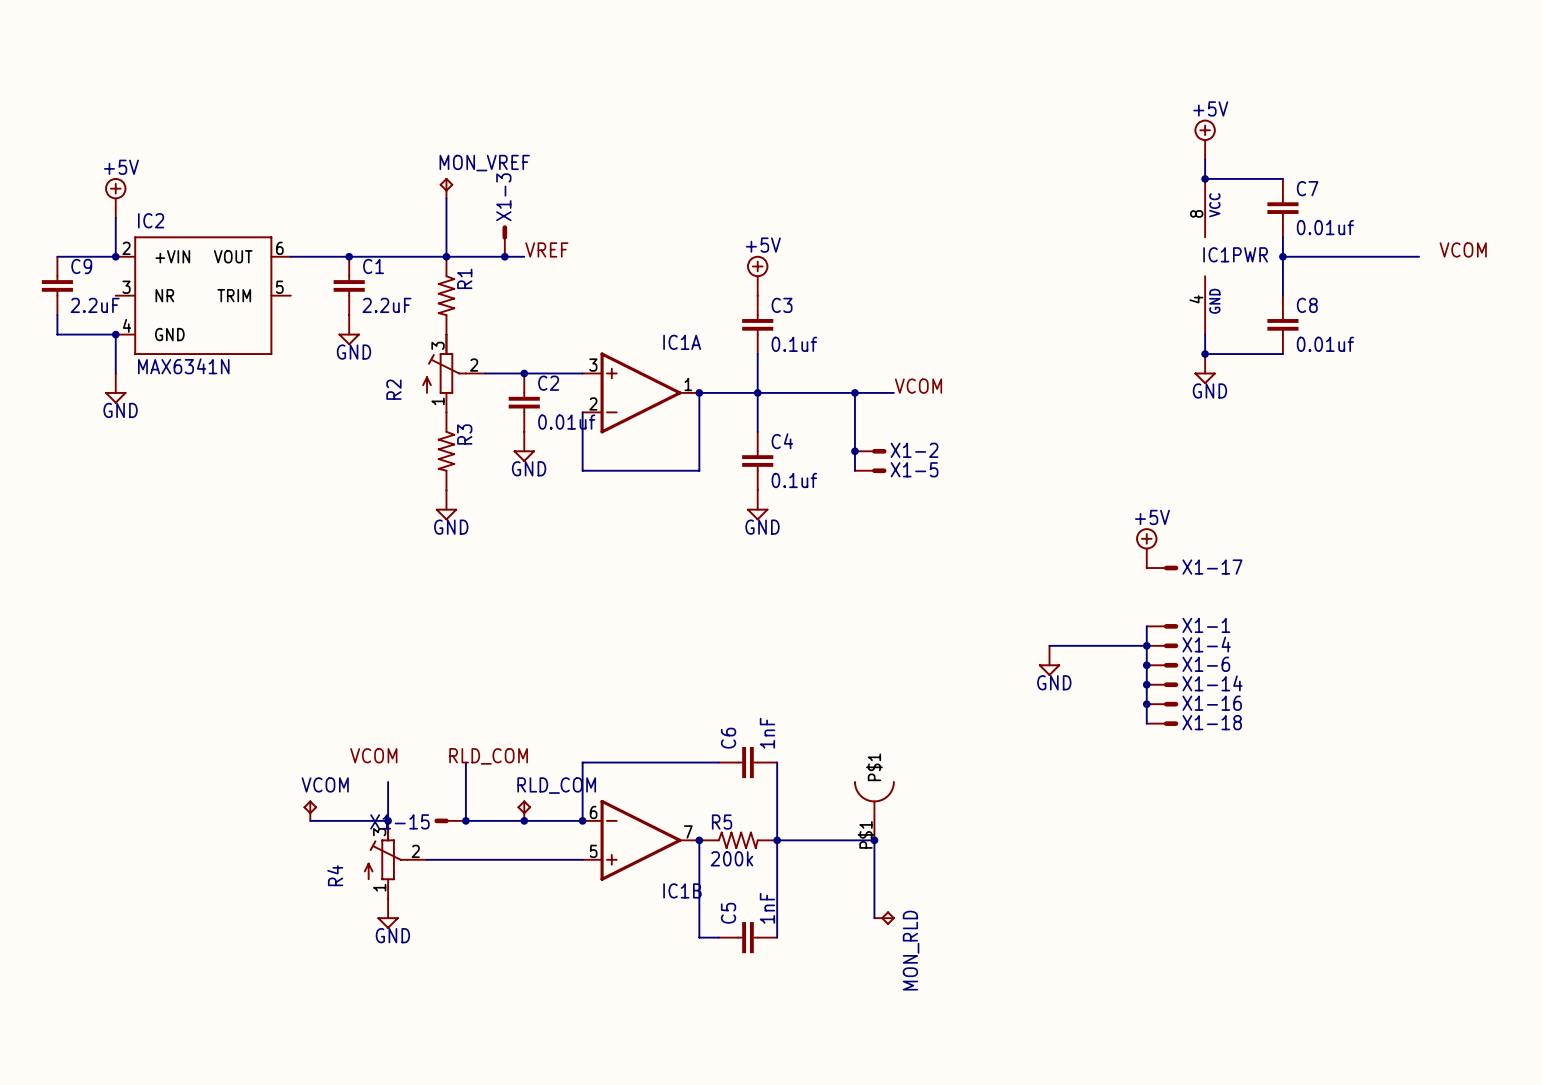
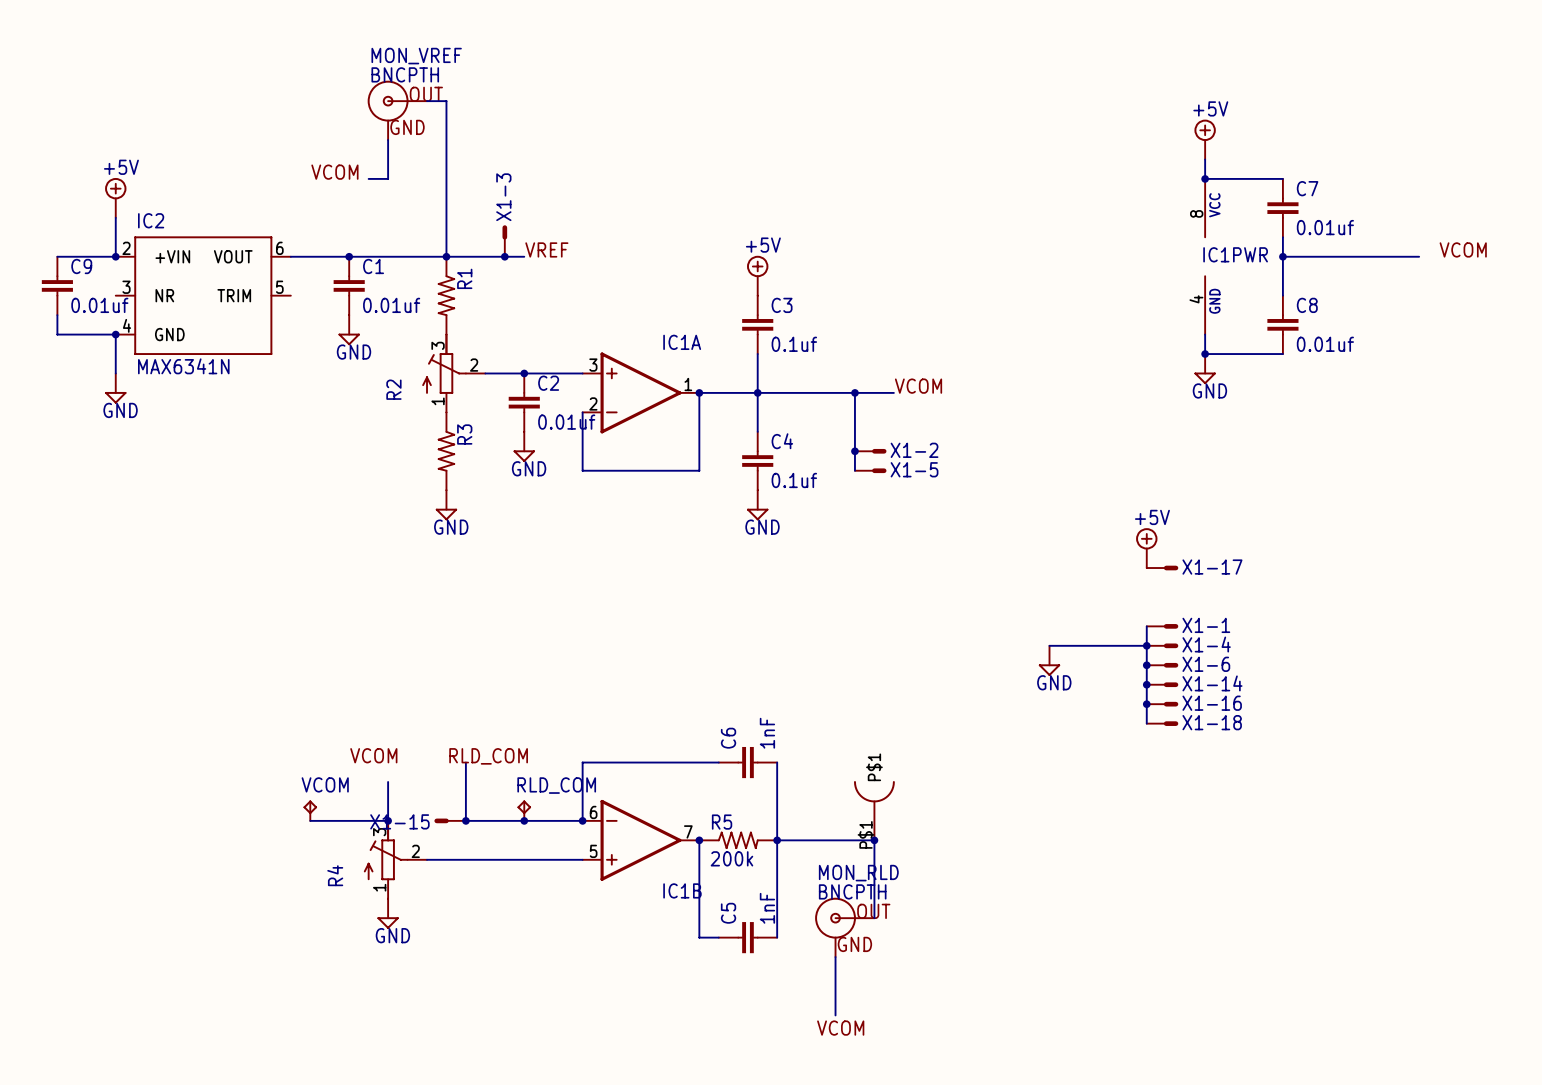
wire: none -> (427, 101) (446, 101) (446, 198)
MON_VREF: none -> BNCPTH (397, 110)
wire: none -> (388, 140) (388, 178) (368, 178)
label: none -> VCOM (334, 172)
MON_VREF: (446, 188) -> none
C9 value: 2.2uF (95, 305) -> 0.01uf (99, 305)
C1 value: 2.2uF (386, 305) -> 0.01uf (391, 305)
MON_RLD: (884, 918) -> none
MON_RLD: none -> BNCPTH (844, 927)
wire: none -> (835, 957) (835, 1015)
label: none -> VCOM (840, 1028)

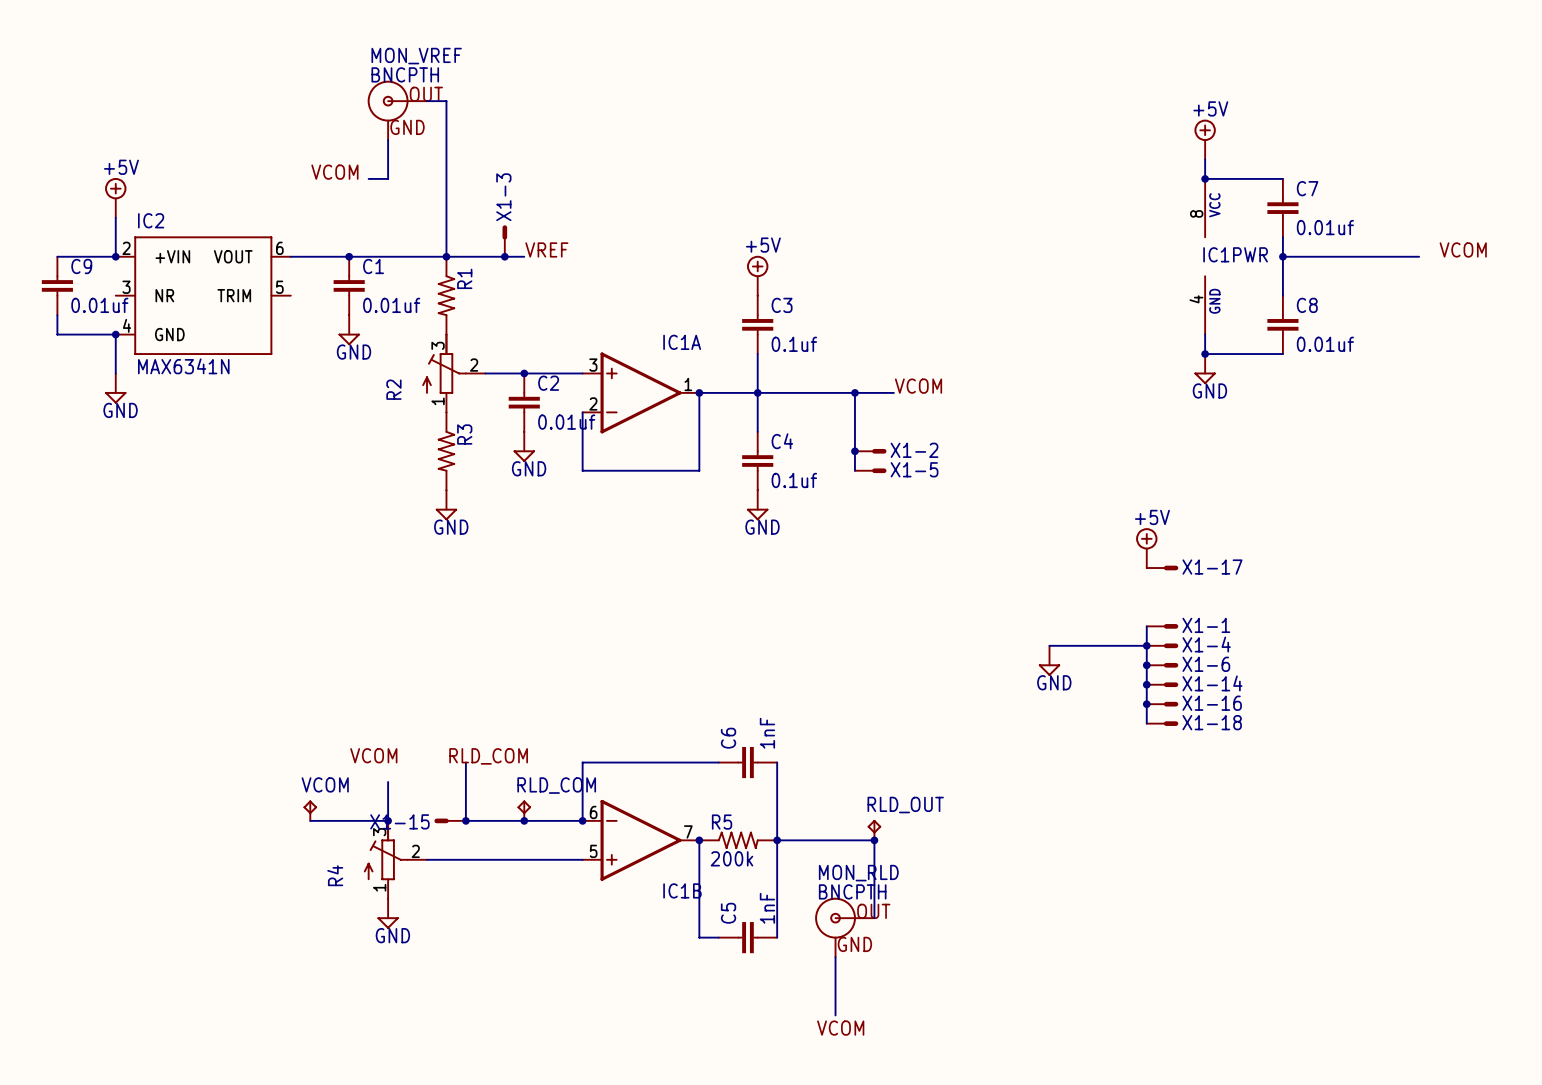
part: (874, 810) -> none
RLD_OUT: none -> (874, 830)

